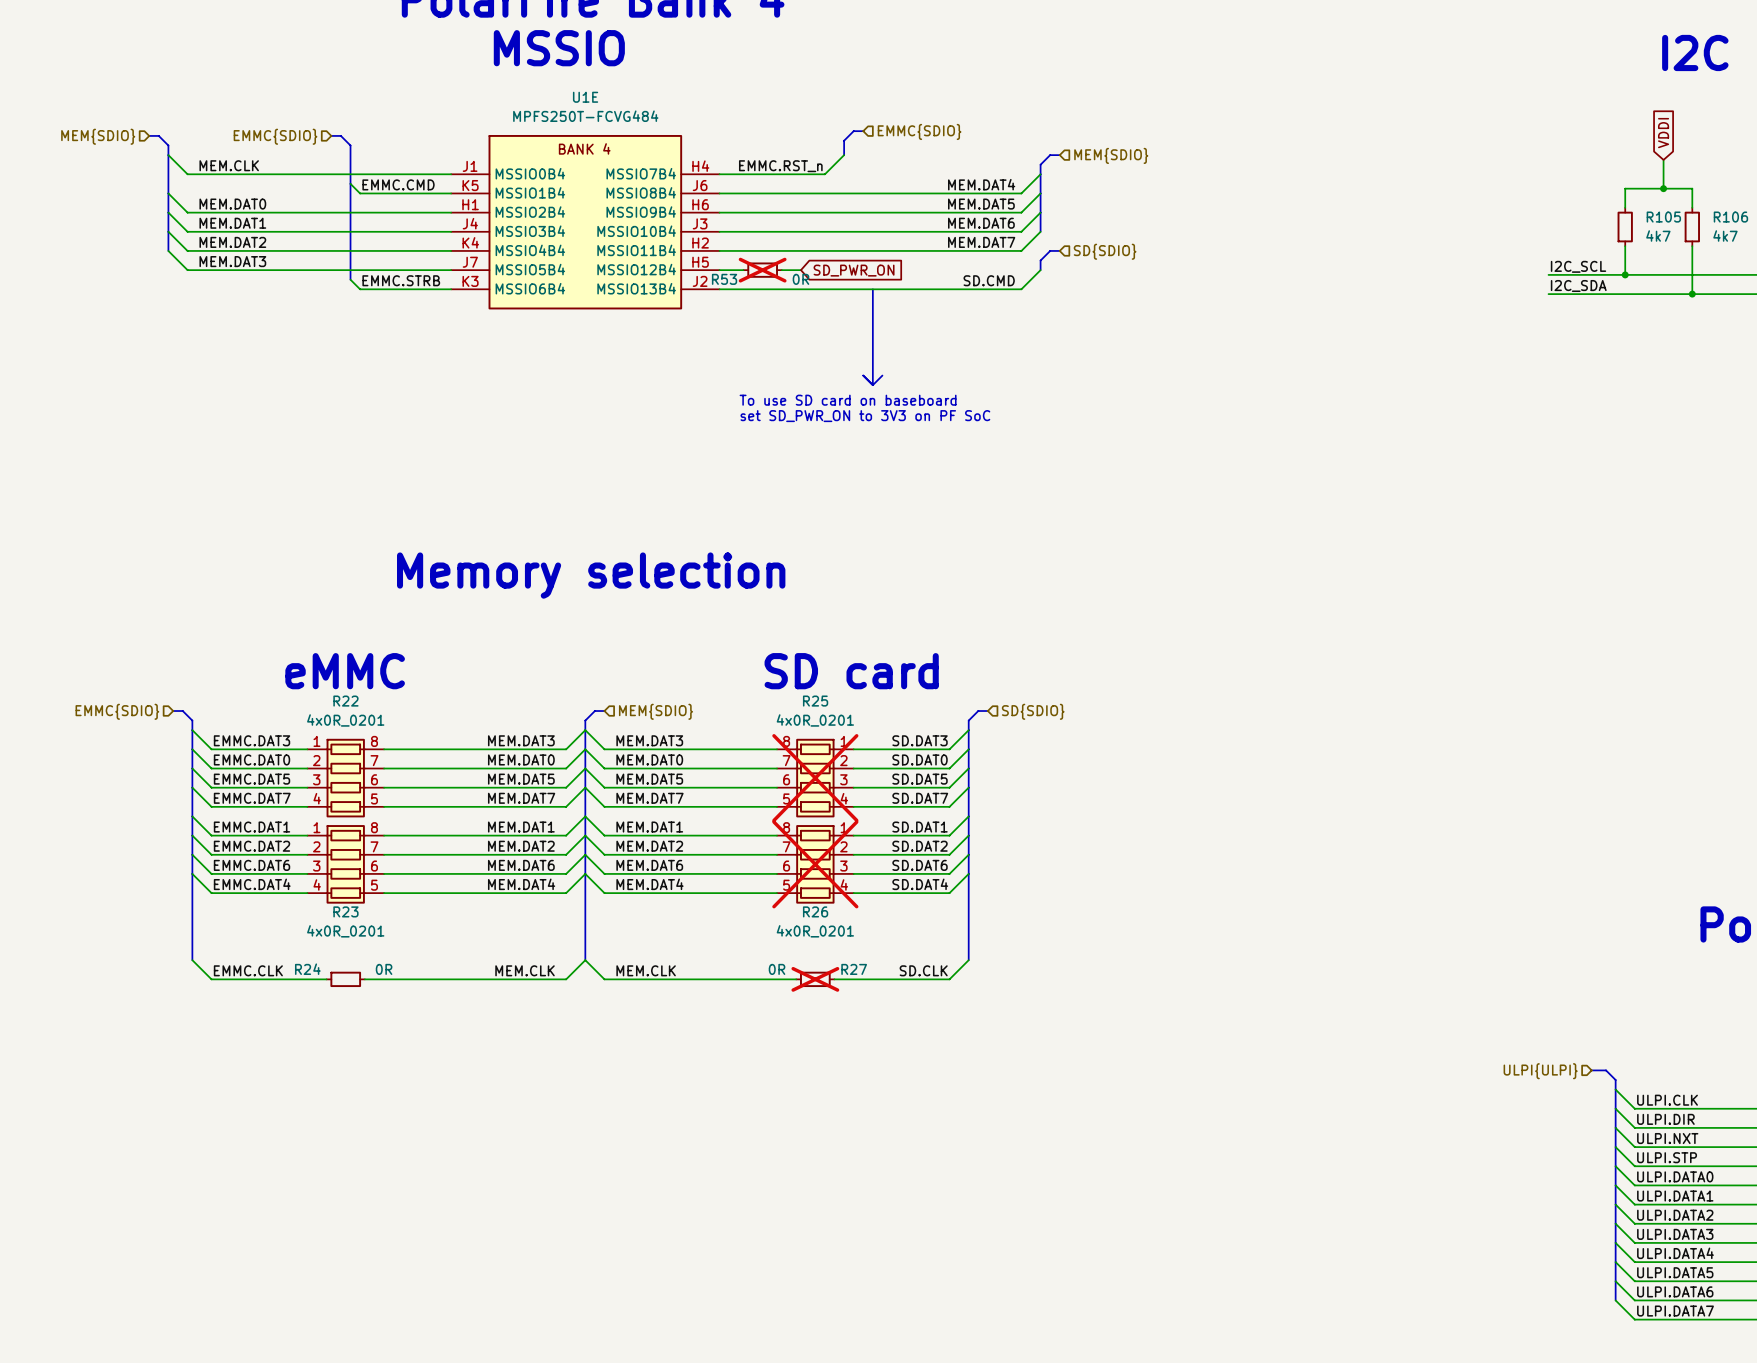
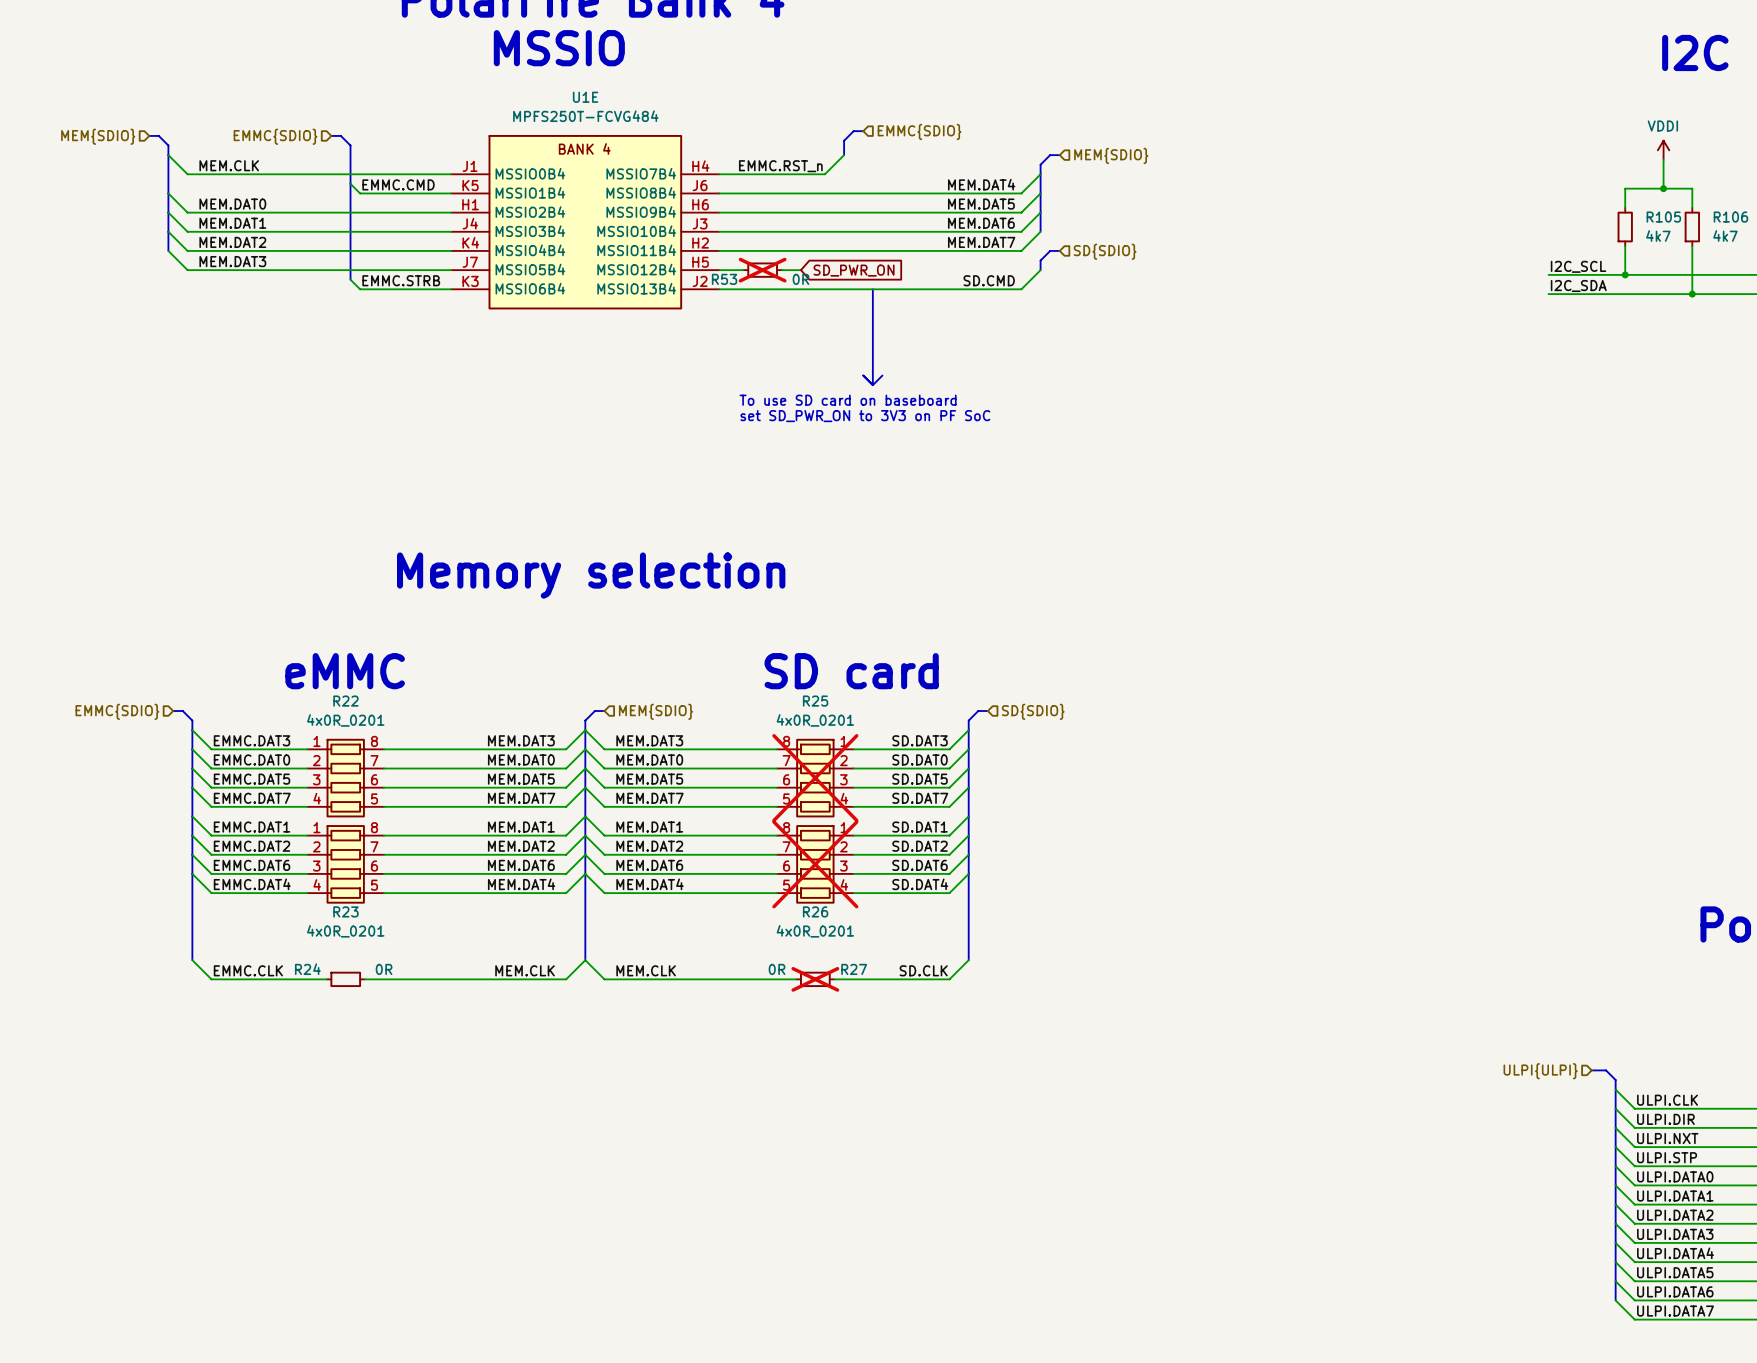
global label: VDDI (1663, 133) -> none
power symbol: none -> VDDI (1663, 150)

